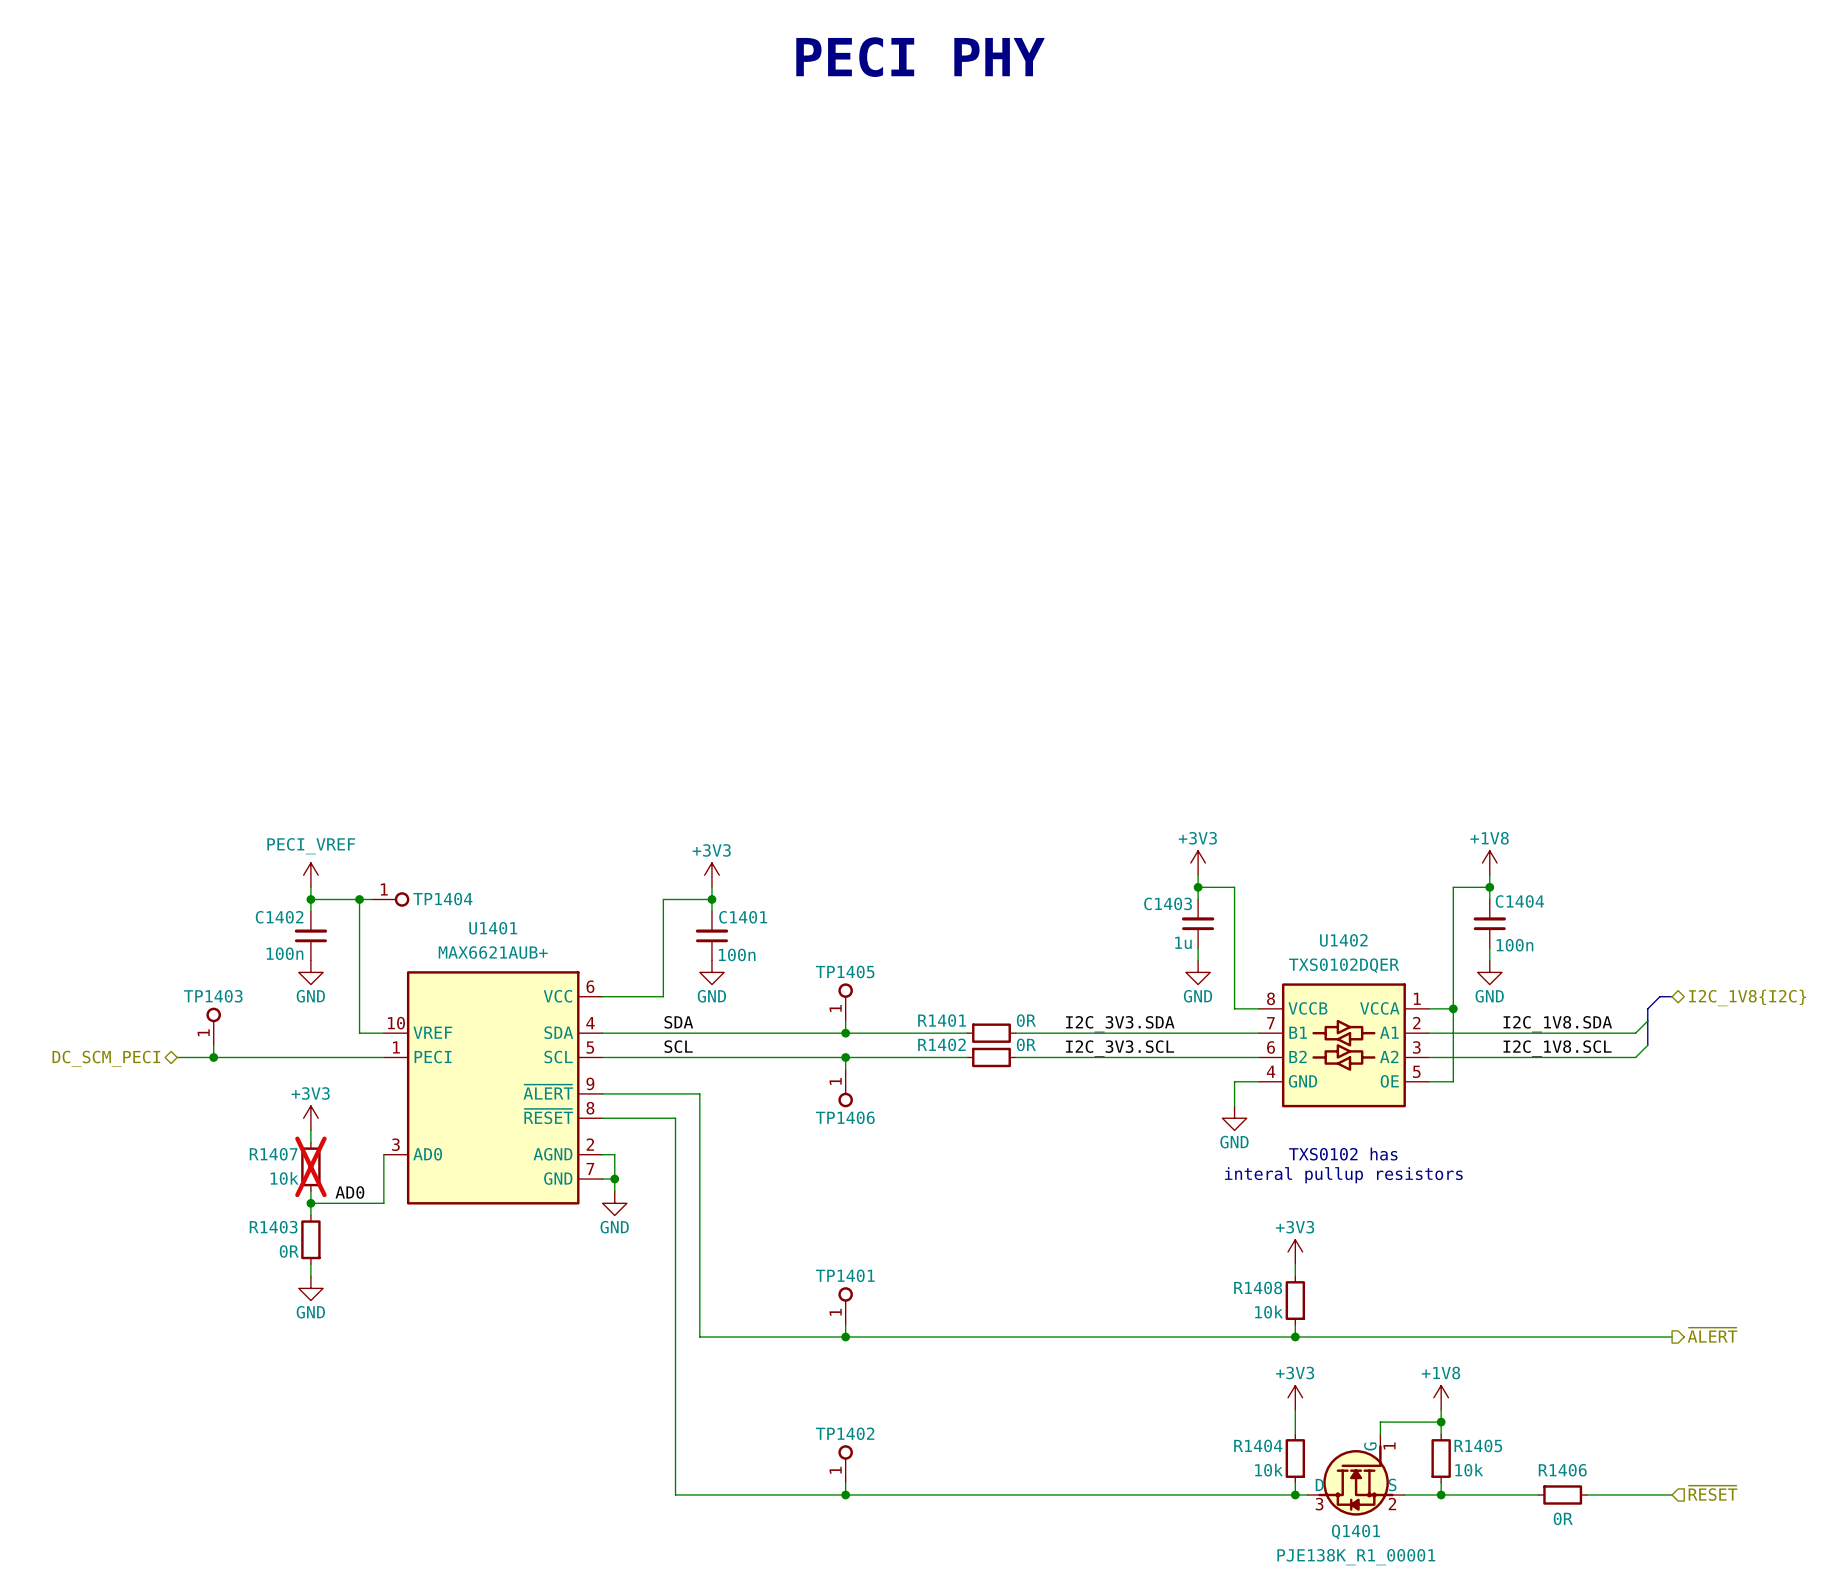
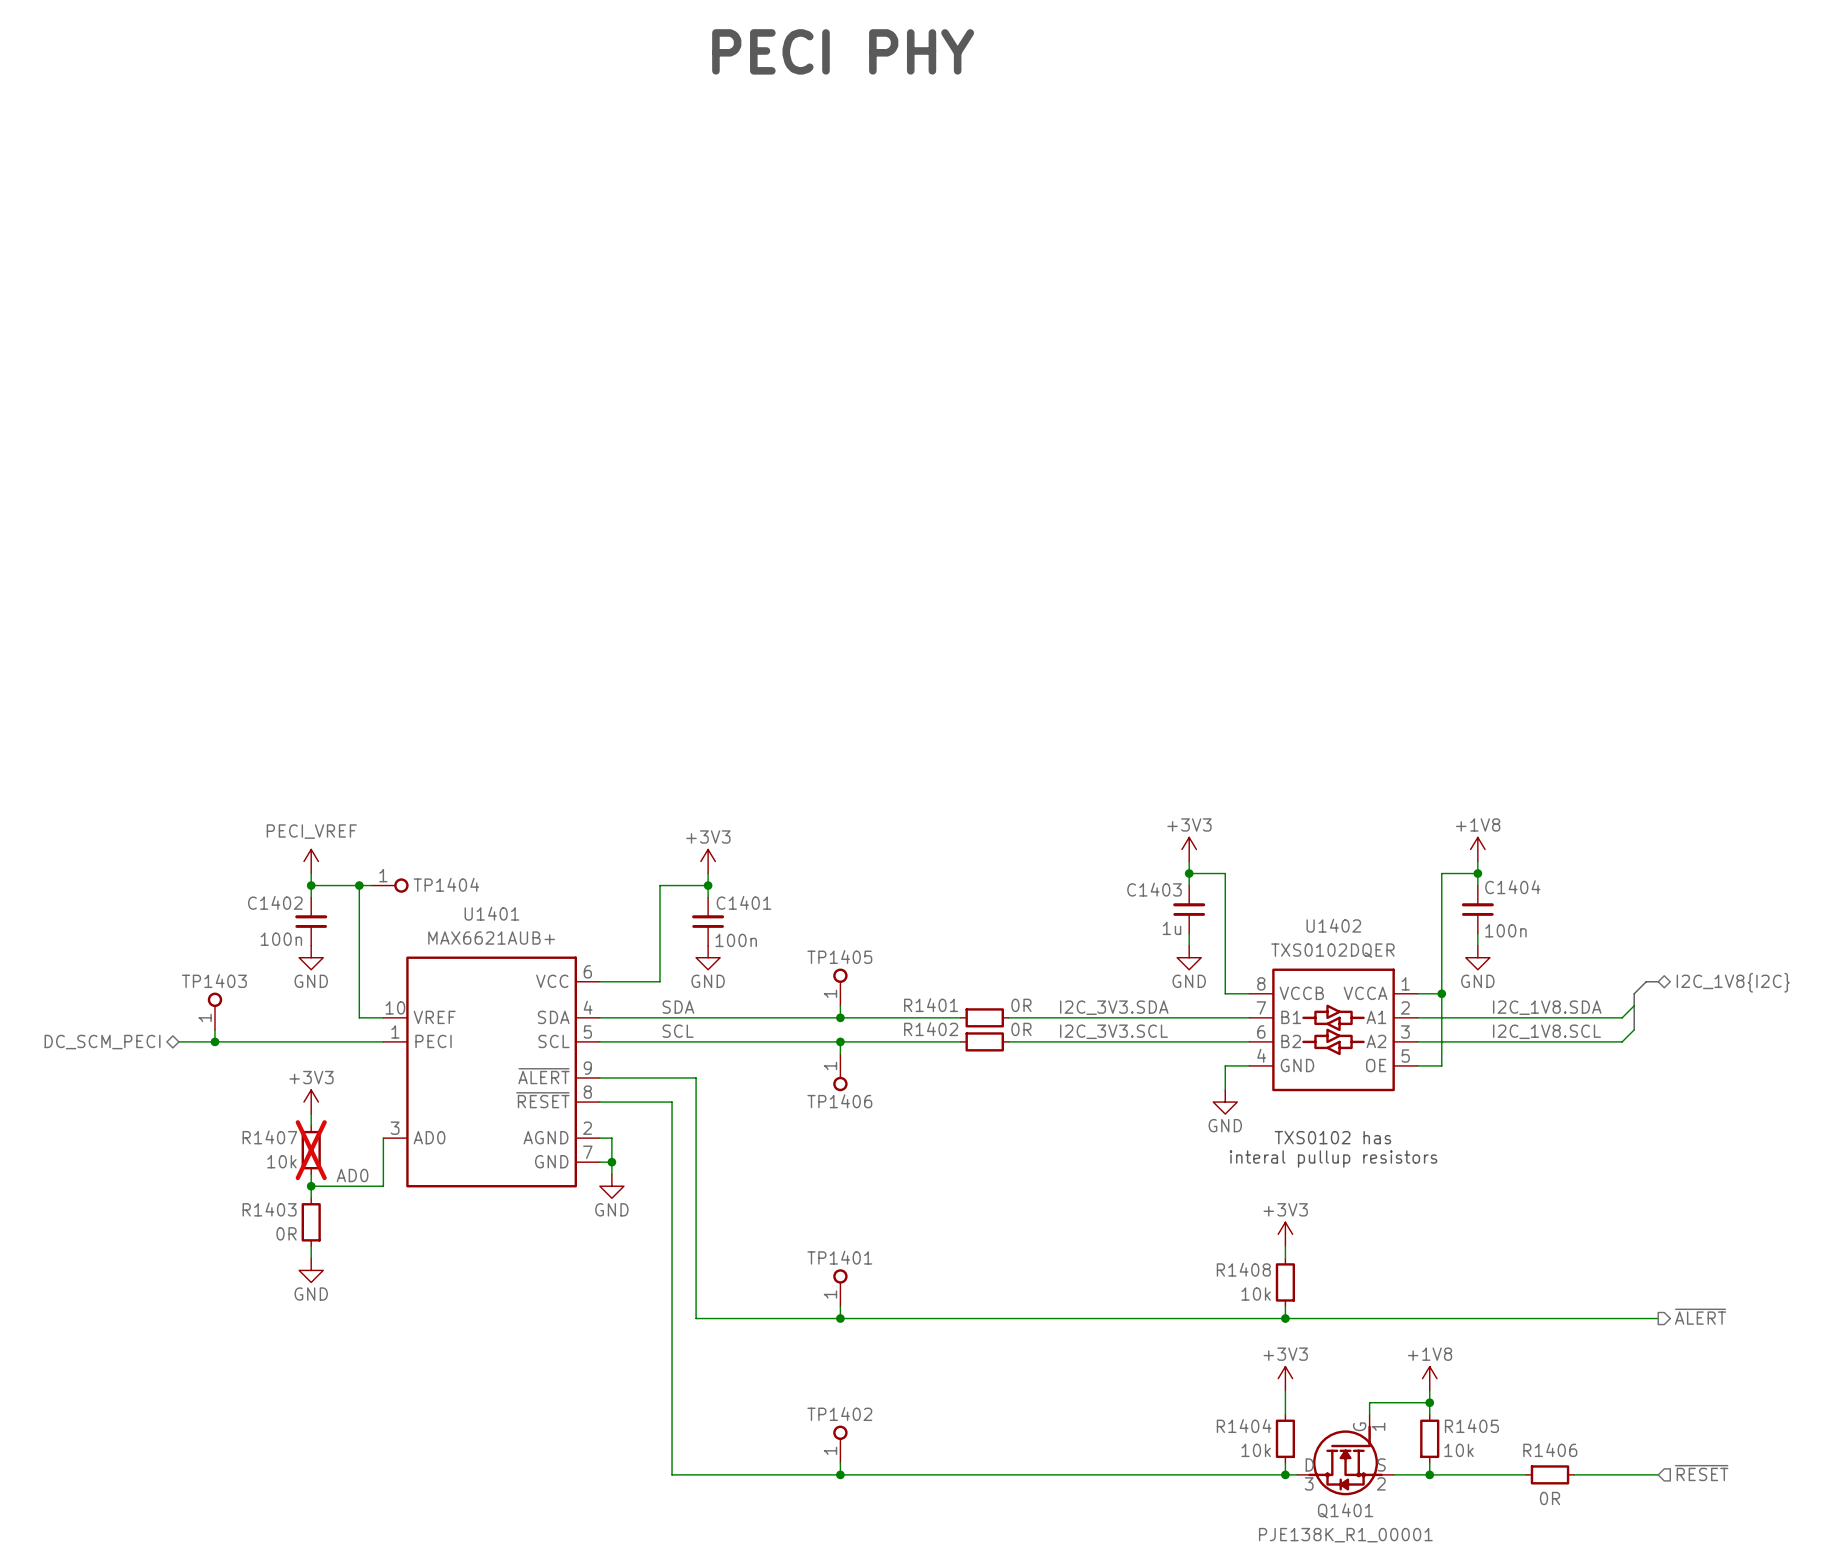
text position: PECI PHY (920, 57) -> PECI PHY (843, 51)

